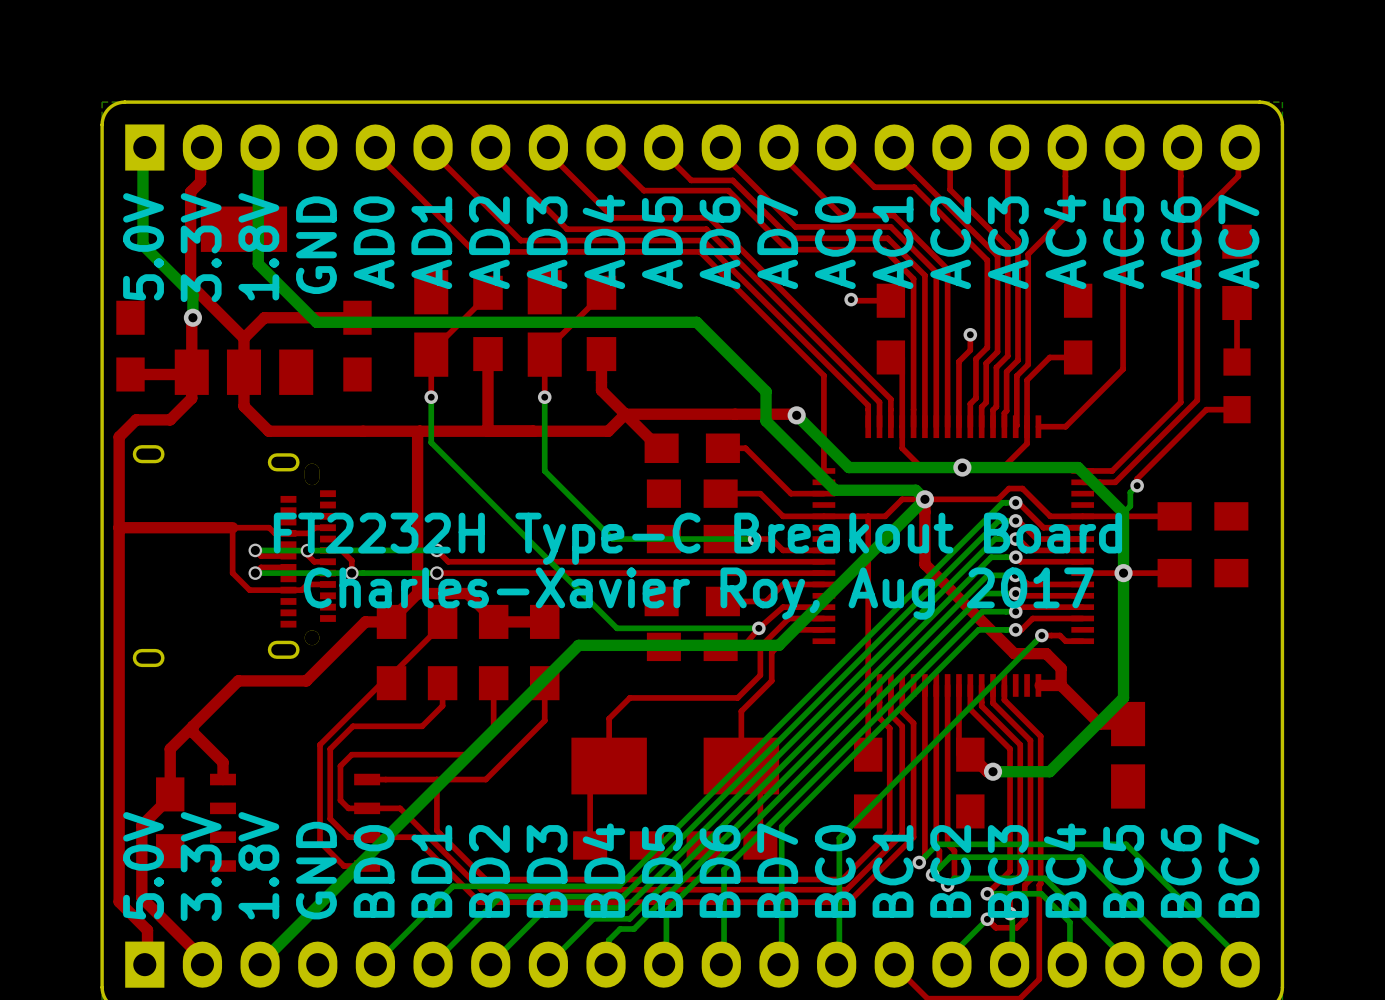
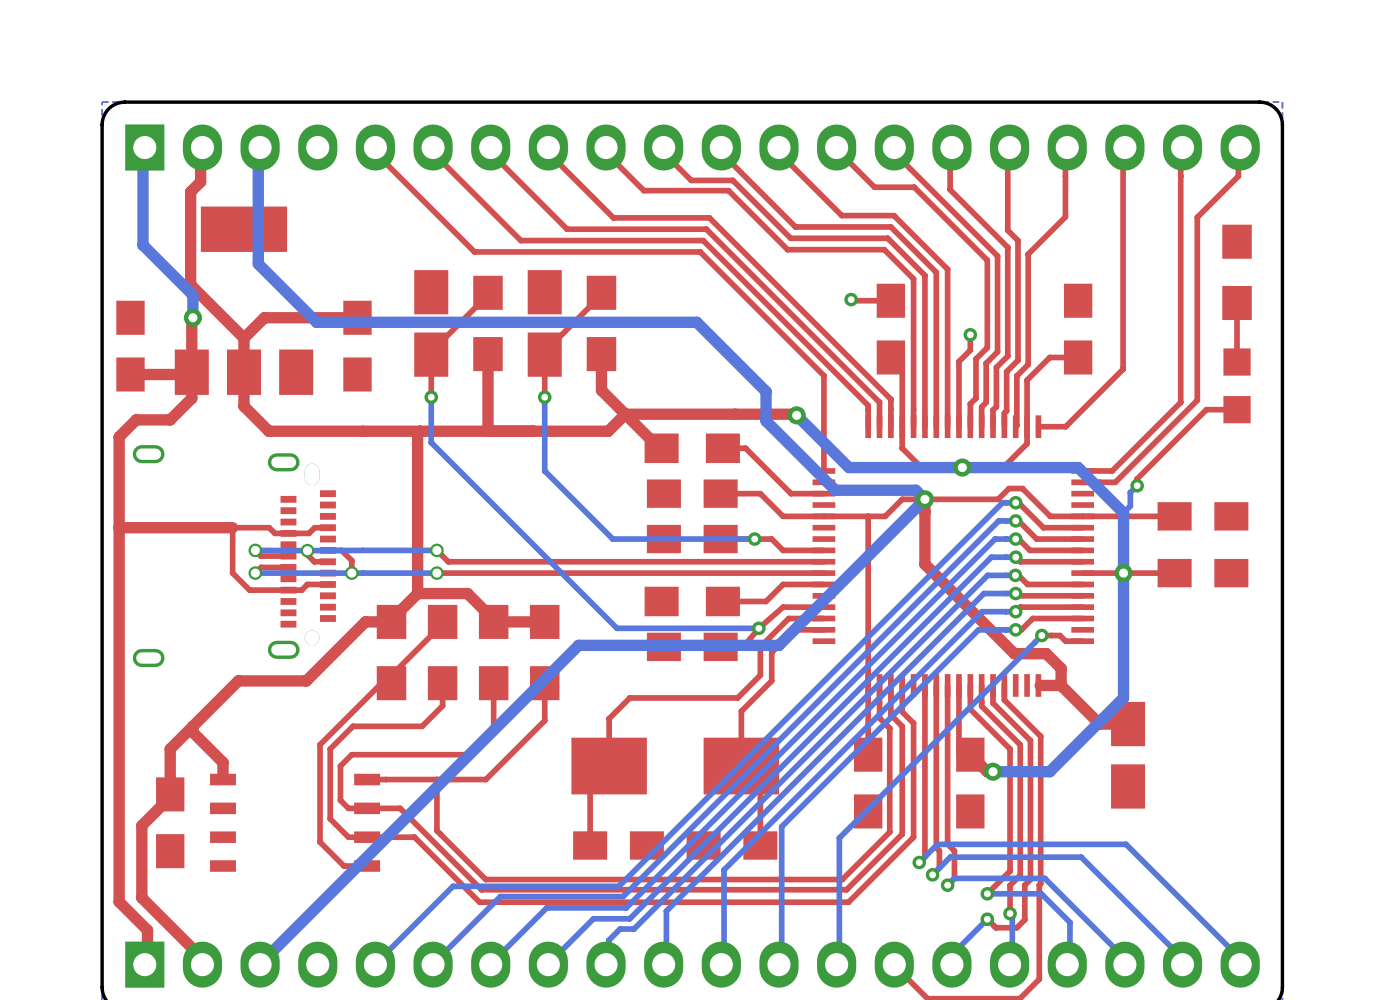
text: AD4 (603, 241) -> none
text: AD7 (777, 241) -> none
text: AC4 (1065, 241) -> none
text: AC7 (1238, 241) -> none
text: AD0 (374, 242) -> none
text: AD1 (431, 242) -> none
text: AD2 (489, 242) -> none
text: AD3 (547, 242) -> none
text: AD5 (662, 242) -> none
text: AD6 (720, 242) -> none
text: AC0 (835, 242) -> none
text: AC1 (893, 242) -> none
text: AC2 (950, 242) -> none
text: AC3 (1008, 242) -> none
text: AC5 (1123, 242) -> none
text: AC6 (1181, 242) -> none
text: GND (316, 245) -> none
text: 5.0V (143, 246) -> none
text: 1.8V (258, 246) -> none
text: 3.3V (201, 247) -> none
text: FT2232H Type-C Breakout Board (697, 538) -> none
text: Charles-Xavier Roy, Aug 2017 (698, 593) -> none
text: 5.0V (143, 865) -> none
text: 1.8V (258, 865) -> none
text: 3.3V (201, 866) -> none
text: GND (316, 870) -> none
text: BD4 (603, 870) -> none
text: BD7 (777, 870) -> none
text: BC4 (1065, 870) -> none
text: BC7 (1238, 870) -> none
text: BD0 (374, 871) -> none
text: BD1 (431, 871) -> none
text: BD2 (489, 871) -> none
text: BD3 (547, 871) -> none
text: BD5 (662, 871) -> none
text: BD6 (720, 871) -> none
text: BC0 (835, 871) -> none
text: BC1 (893, 871) -> none
text: BC2 (950, 871) -> none
text: BC3 (1008, 871) -> none
text: BC5 (1123, 871) -> none
text: BC6 (1181, 871) -> none

